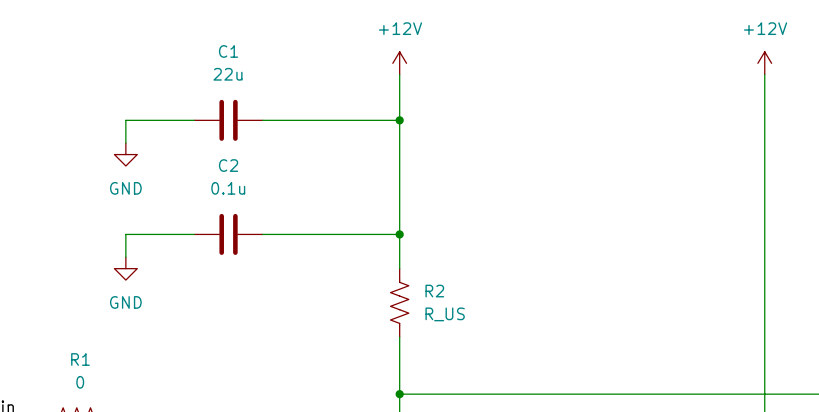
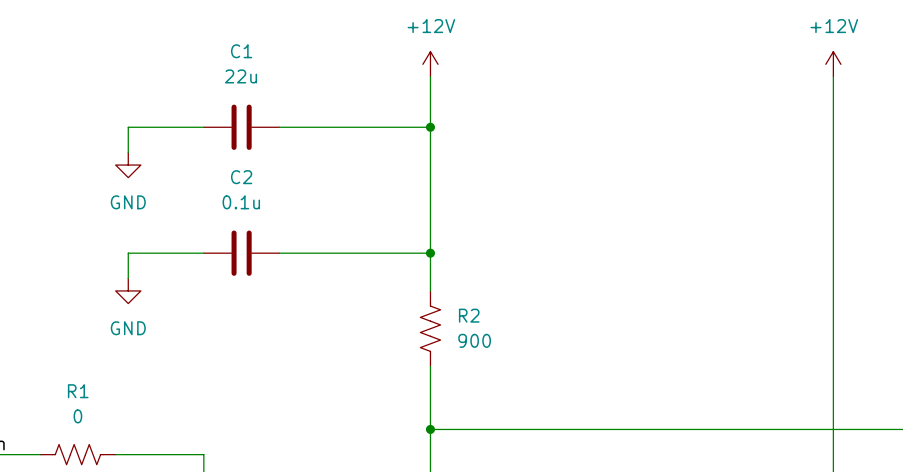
R2 value: R_US (445, 314) -> 900 (474, 340)

